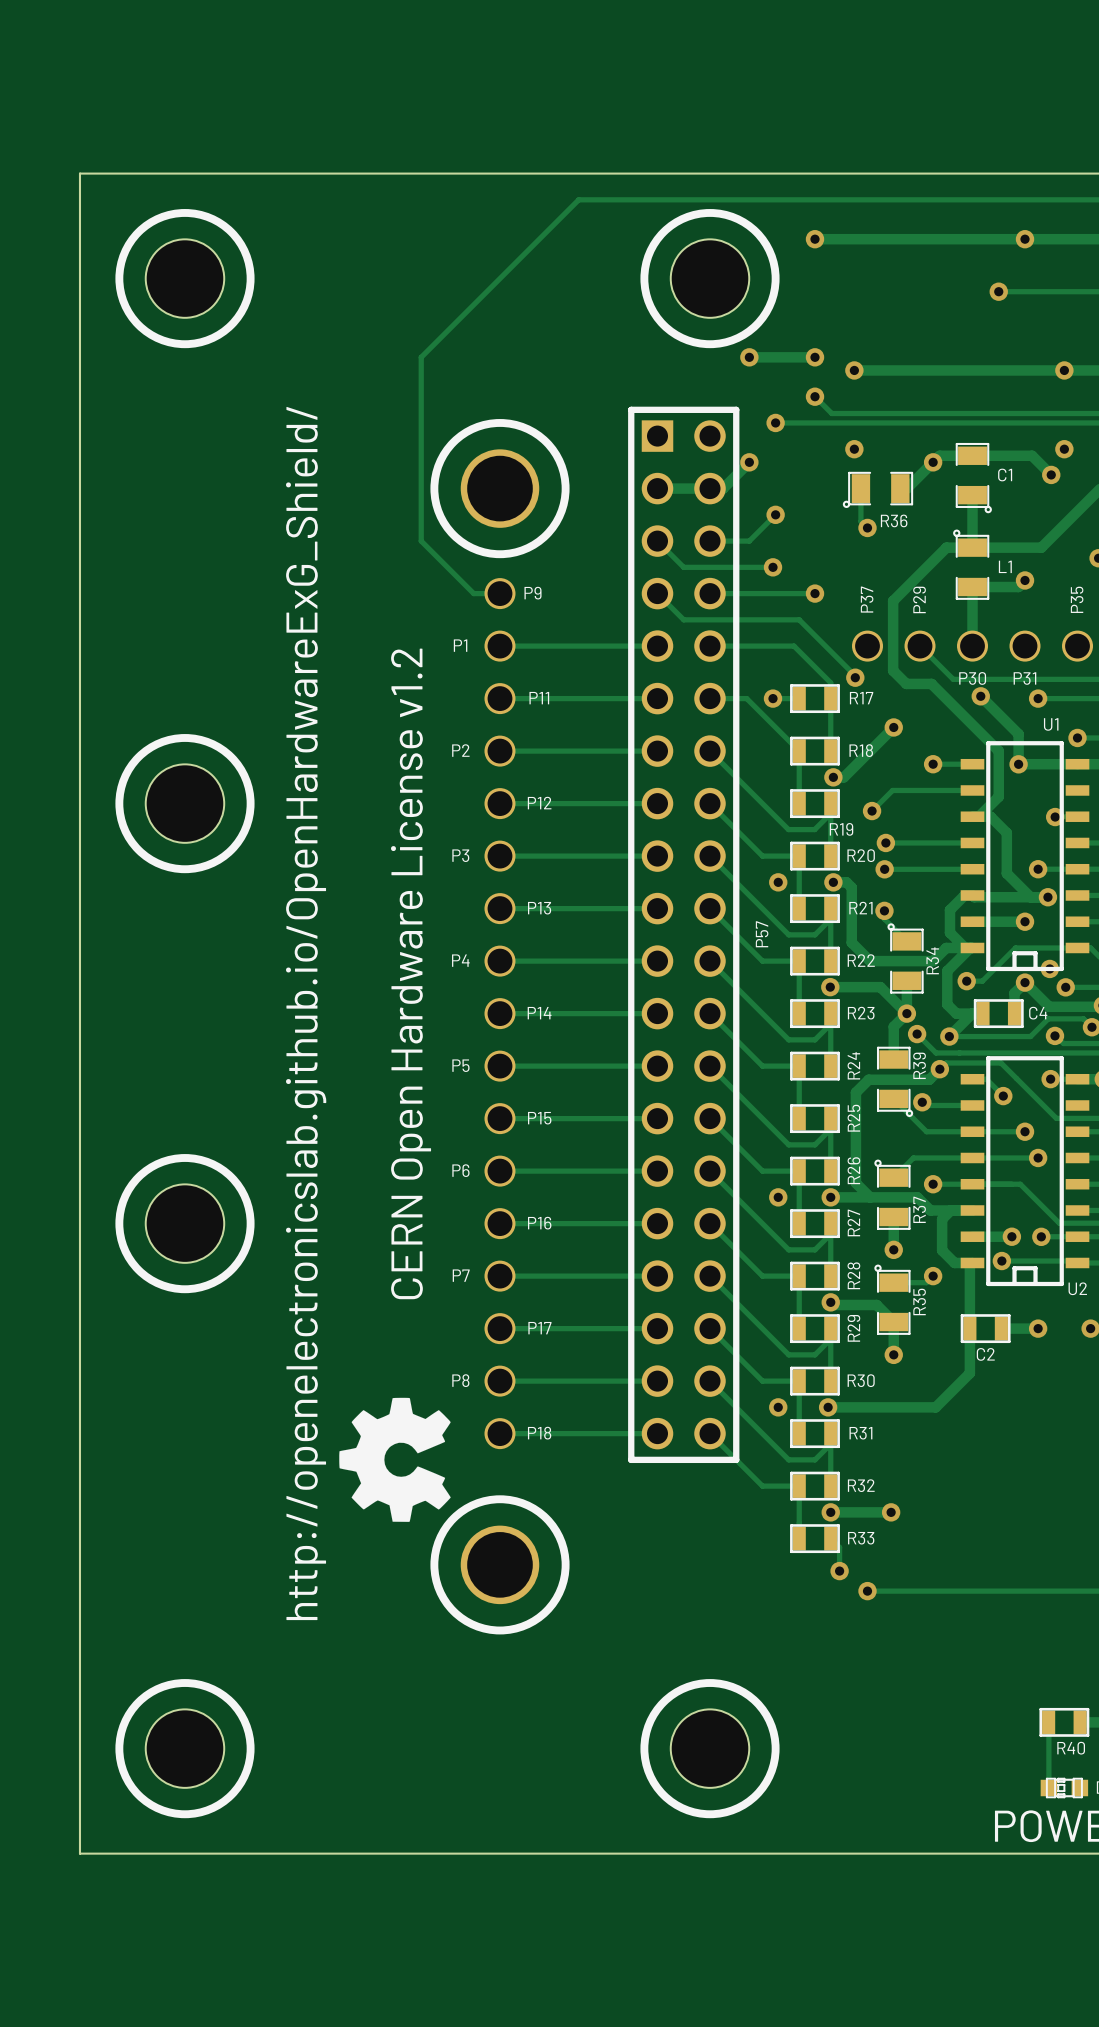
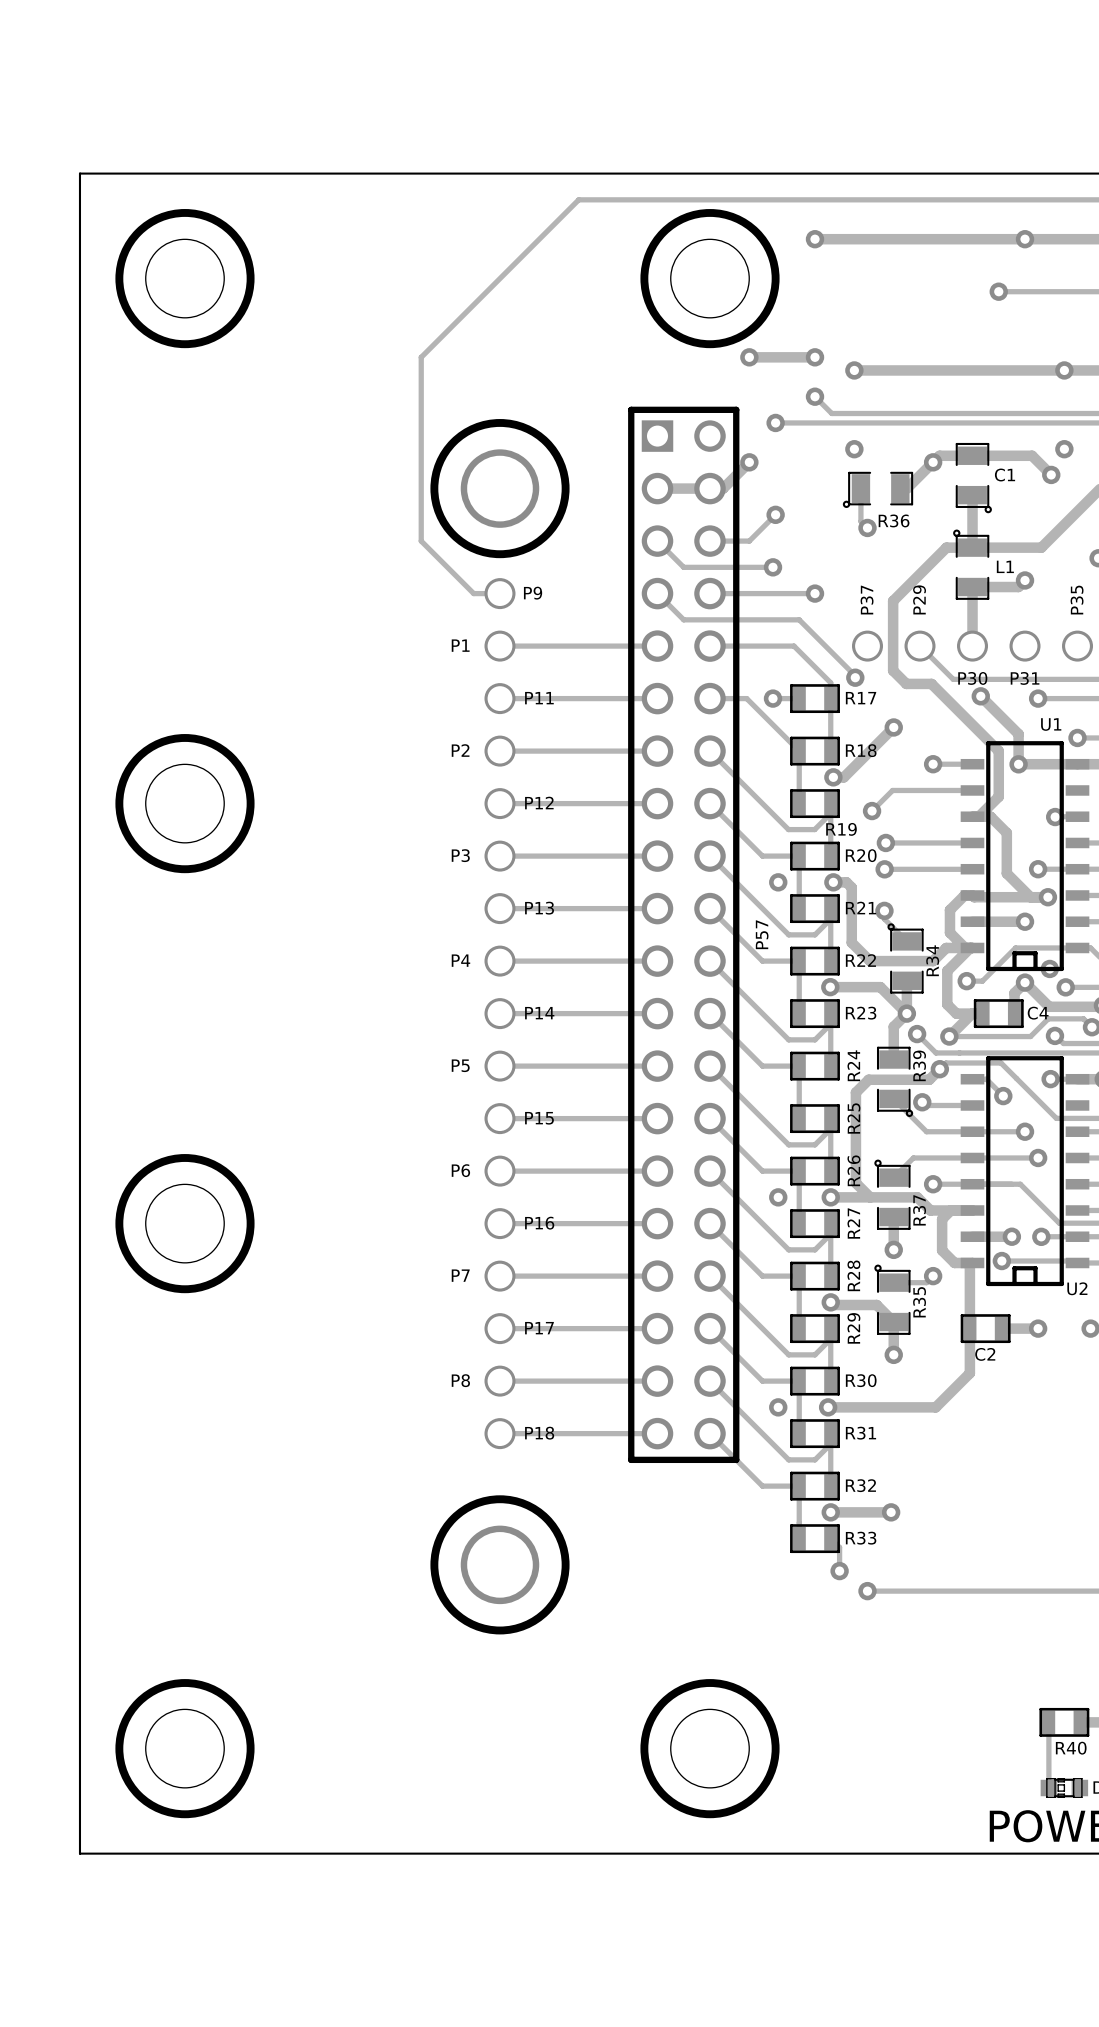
text: CERN Open Hardware License v1.2 (411, 973) -> none
text: http://openelectronicslab.github.io/OpenHardwareExG_Shield/ (306, 1013) -> none
drawing: [339, 1397, 451, 1522] -> none

